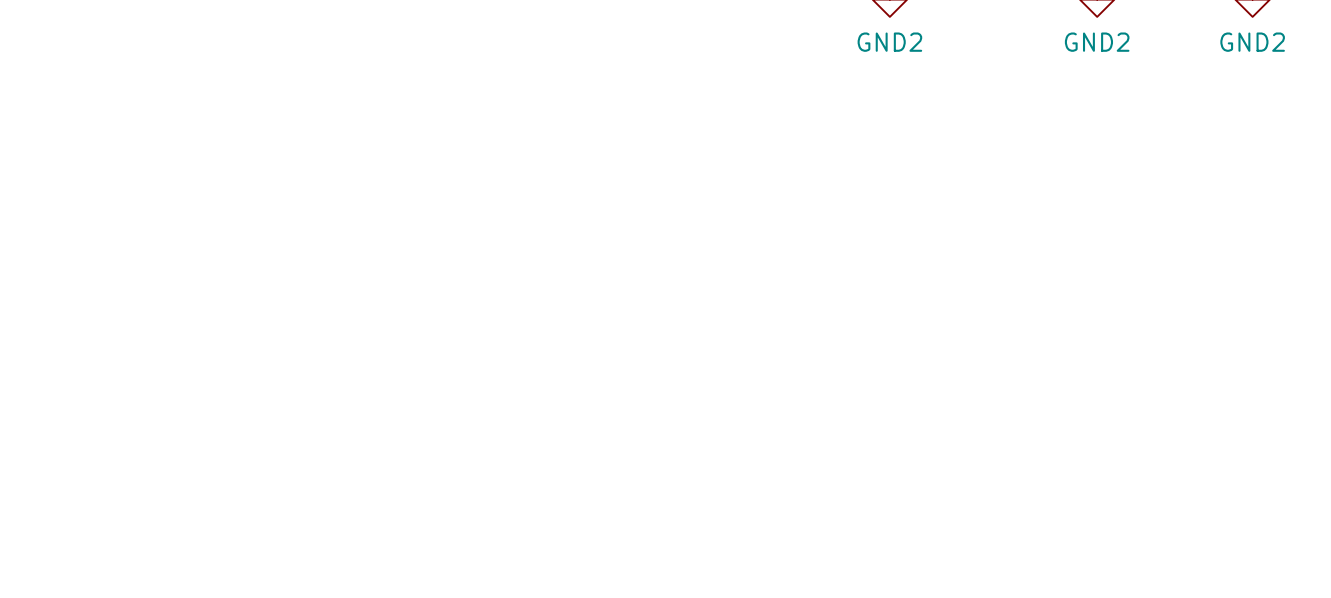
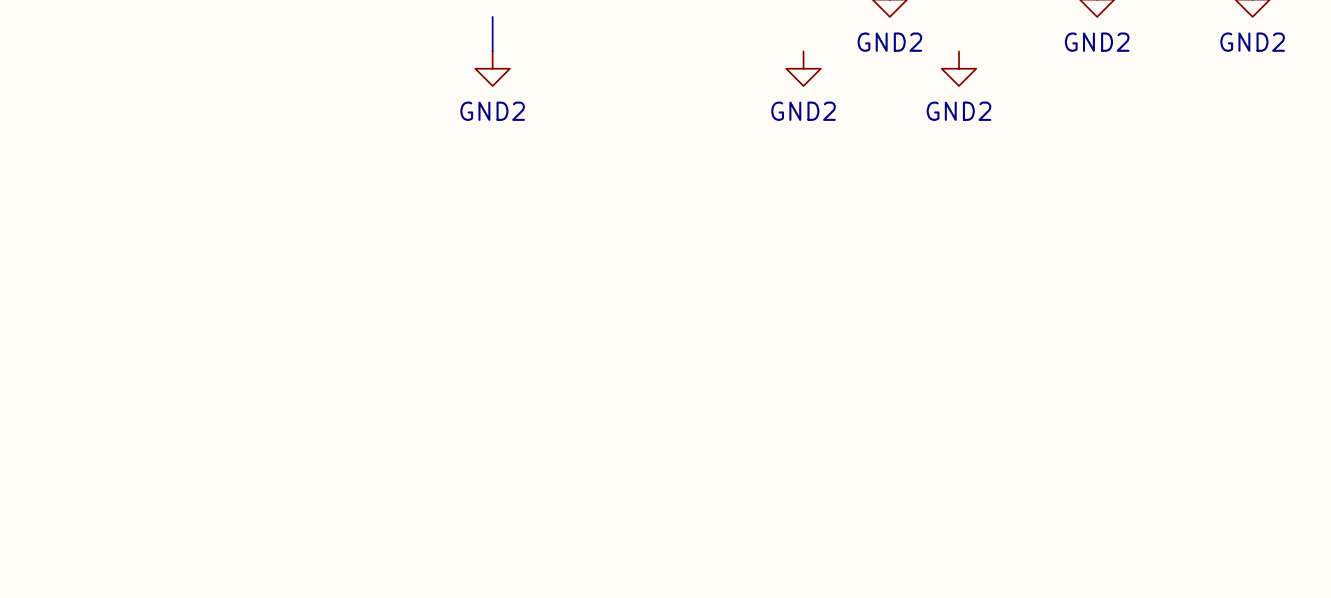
wire: none -> (492, 16) (492, 51)
power symbol: none -> GND2 (492, 68)
power symbol: none -> GND2 (803, 68)
power symbol: none -> GND2 (958, 68)

